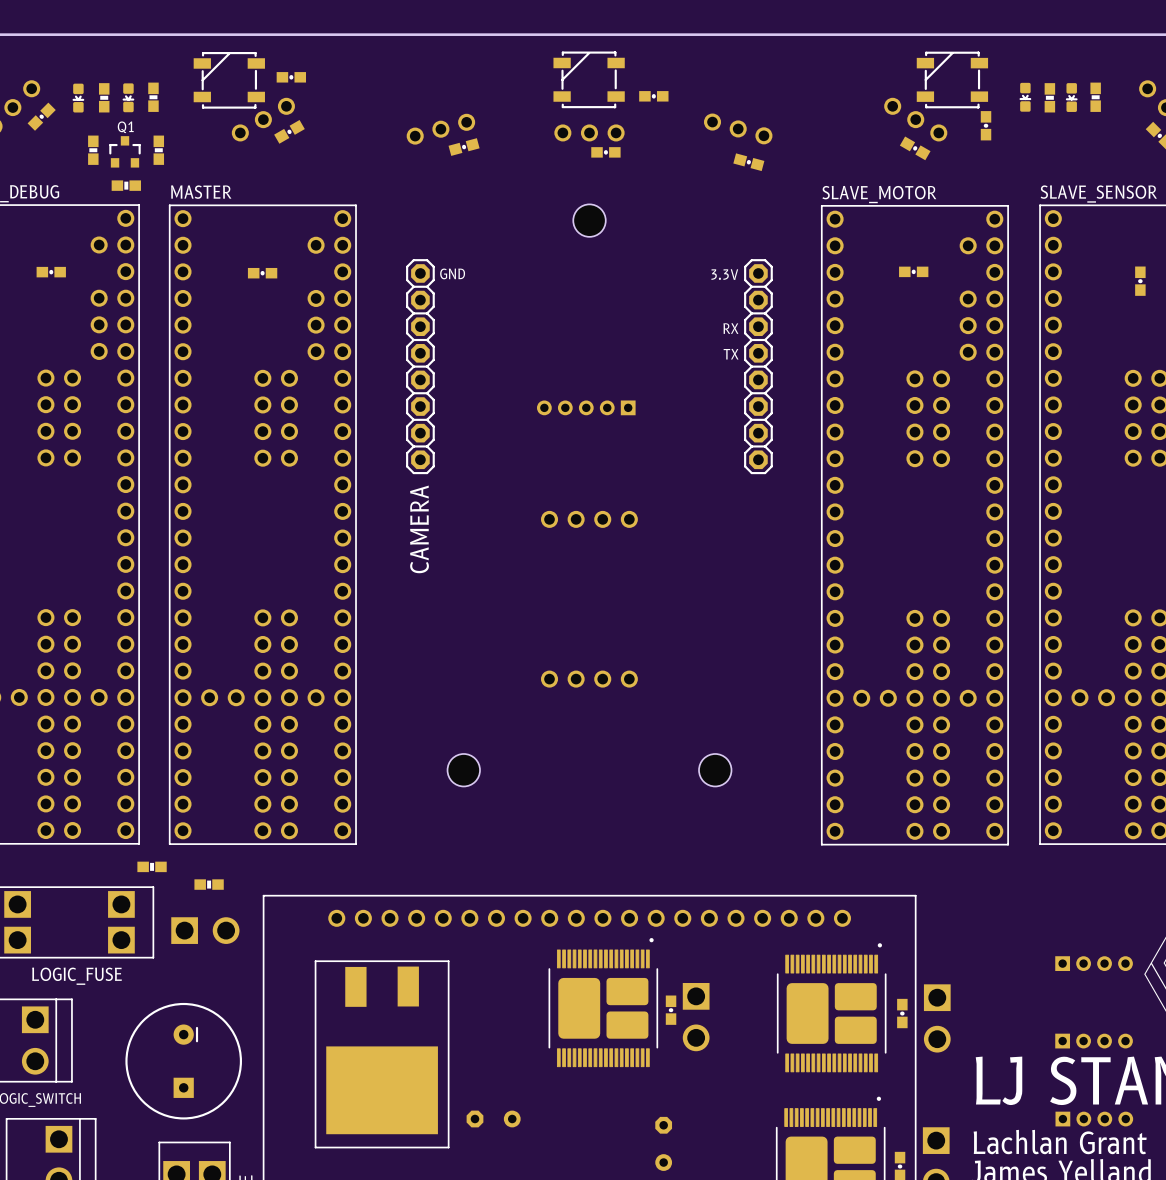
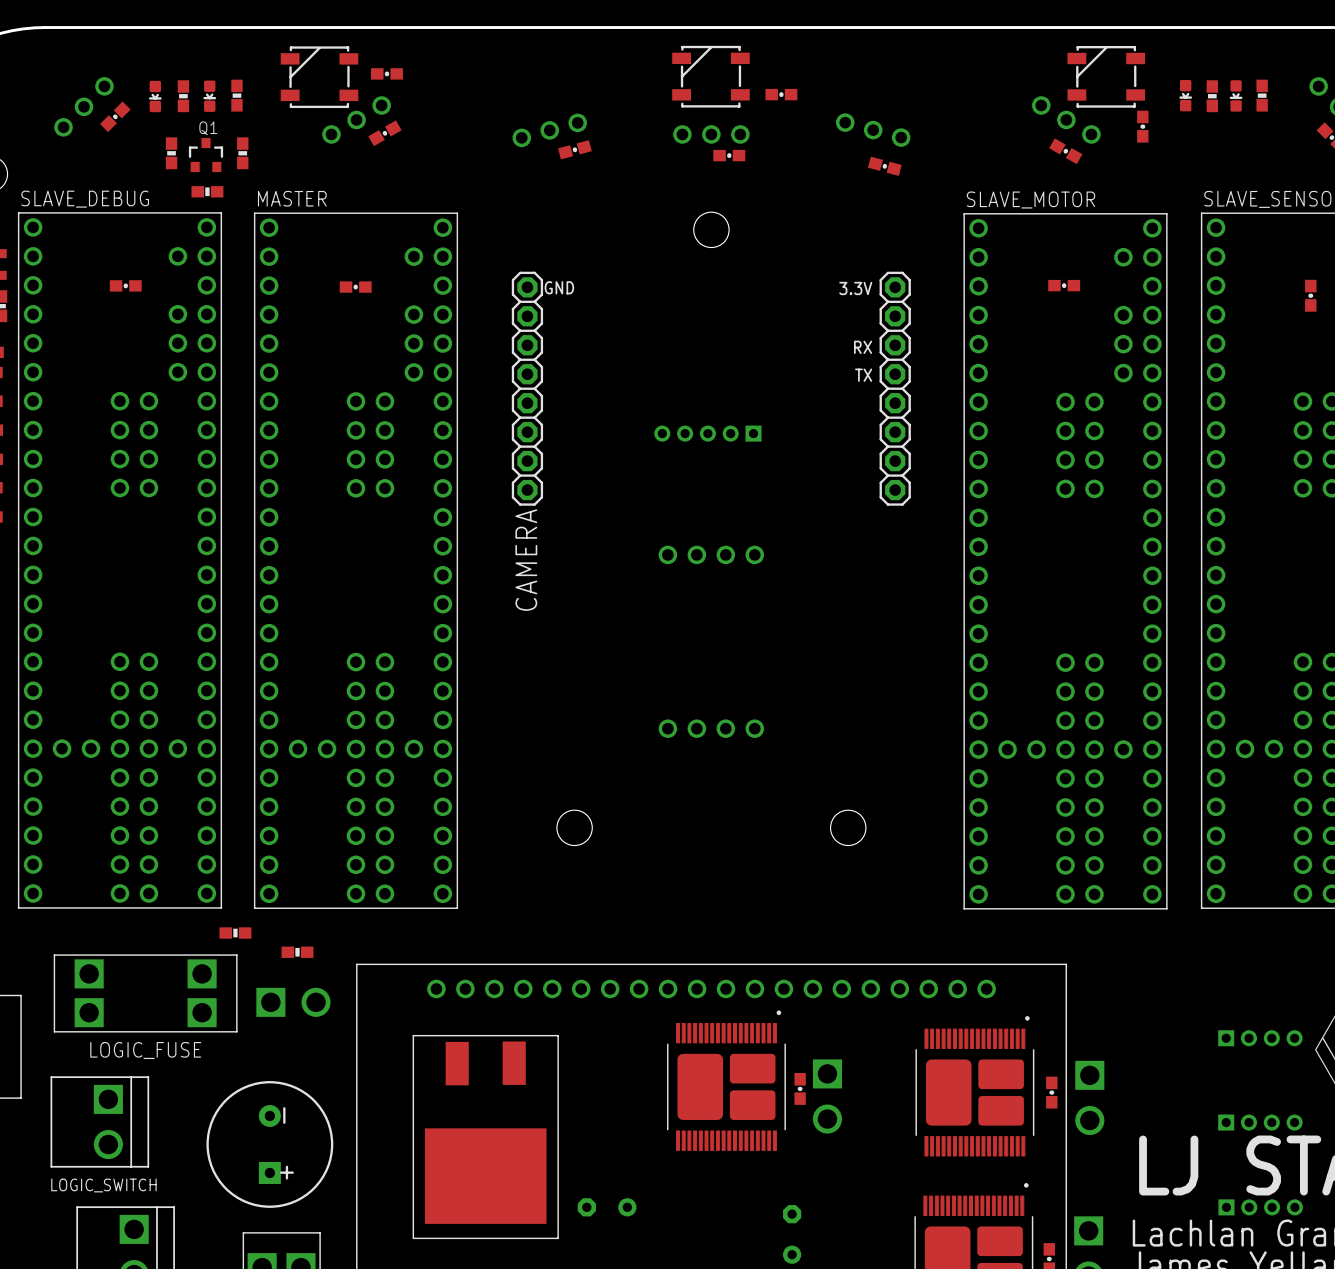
part footprint: [125, 1002, 242, 1120] -> [206, 1081, 334, 1208]

